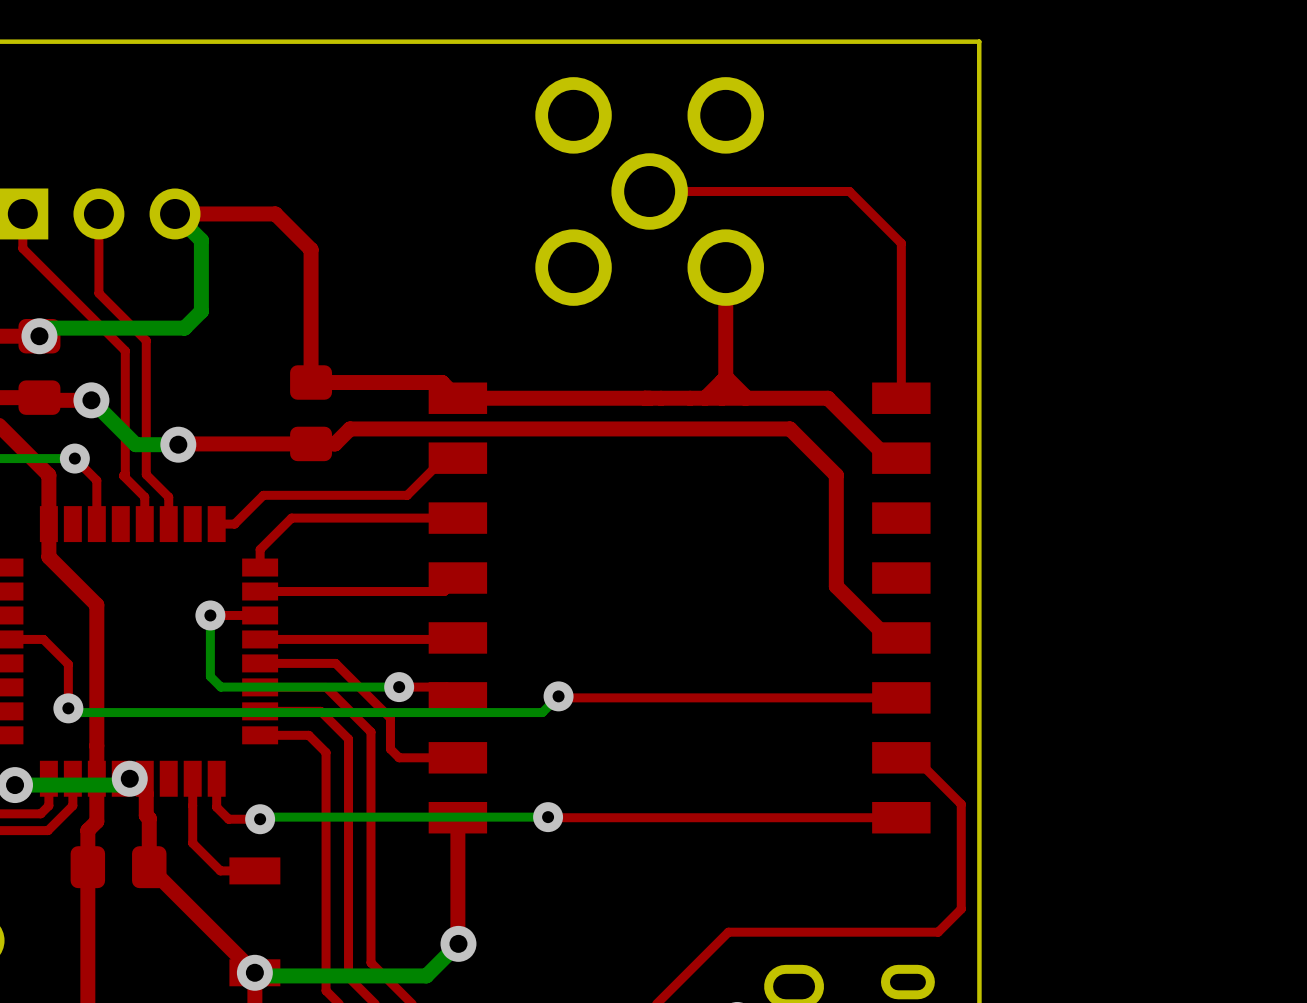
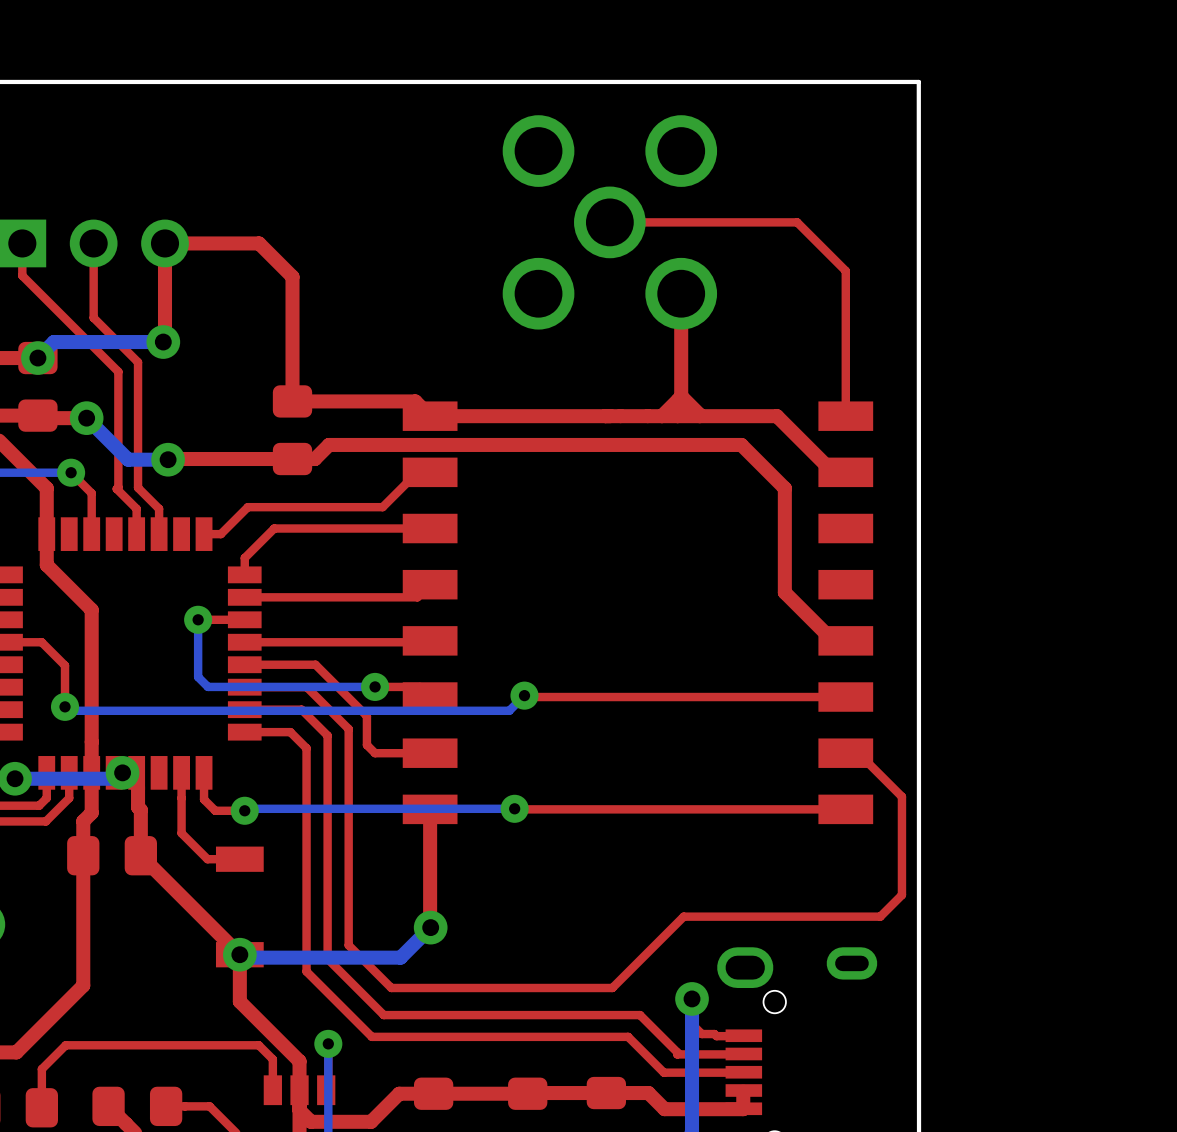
top track: none -> (165, 243) (165, 340) (163, 342)
bottom track: (175, 213) (201, 240) (201, 311) (184, 328) (47, 328) -> (163, 342) (53, 342) (45, 350)
via: none -> (163, 342)

